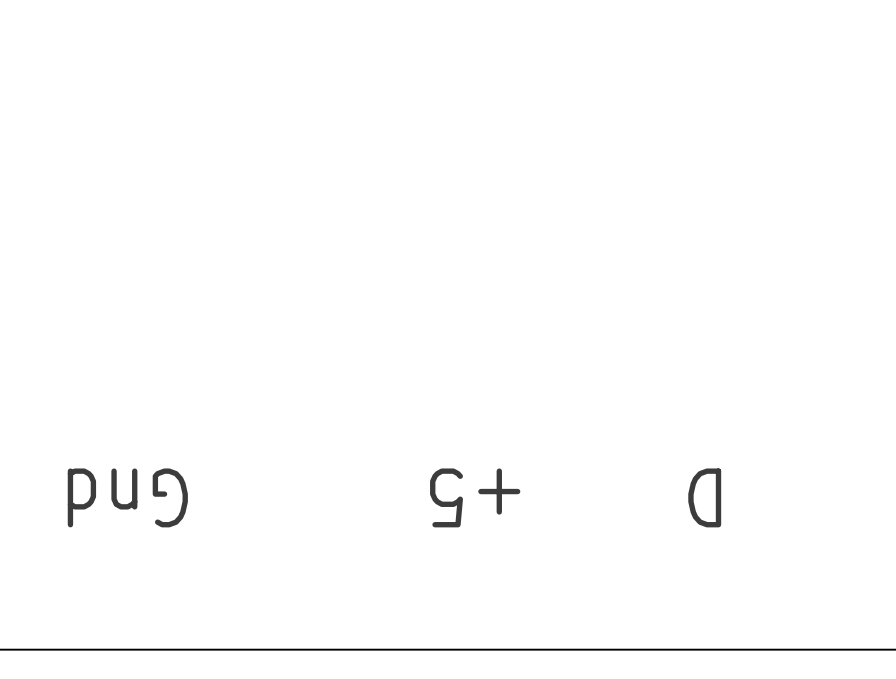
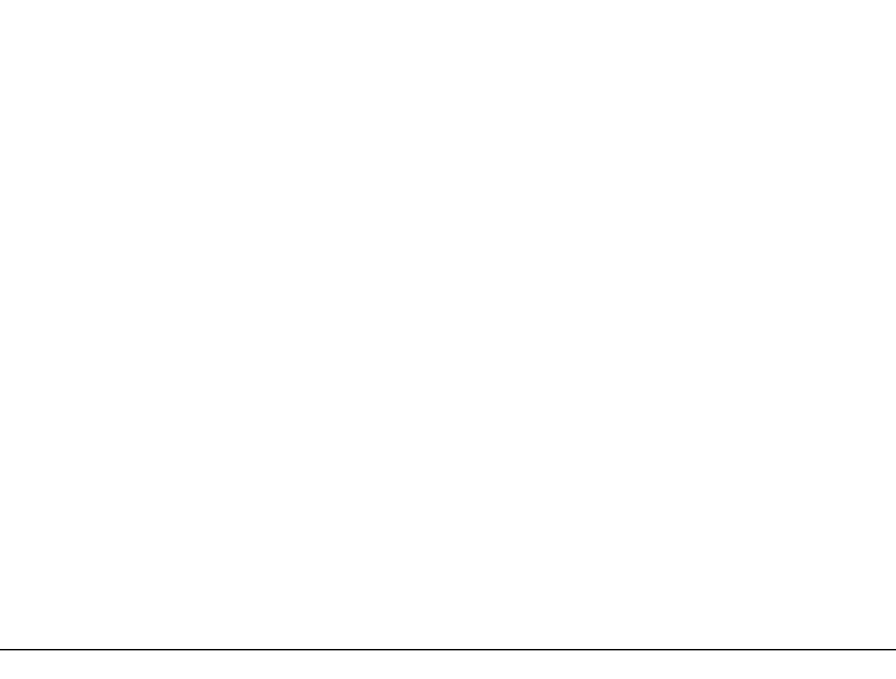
text: Gnd (127, 497) -> none
text: +5 (475, 497) -> none
text: D (704, 497) -> none

